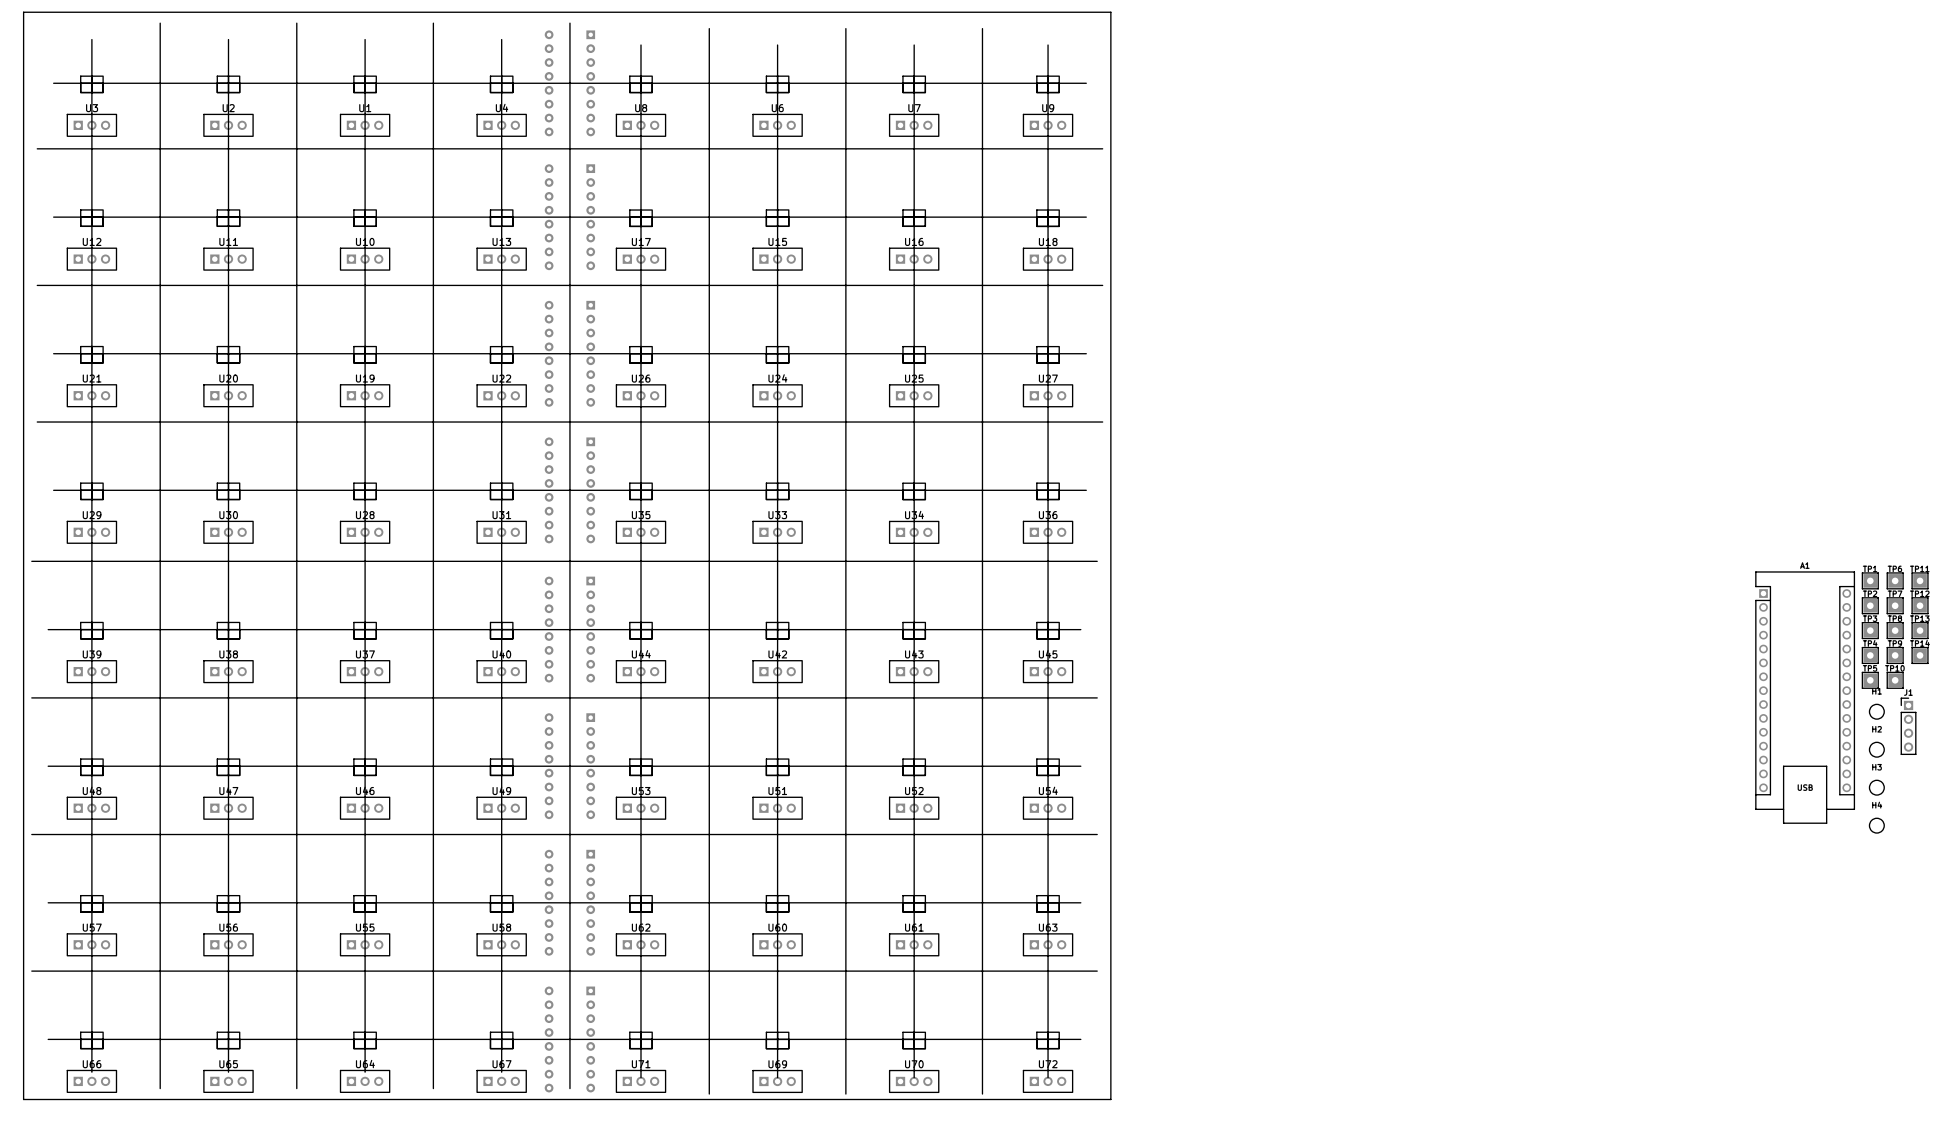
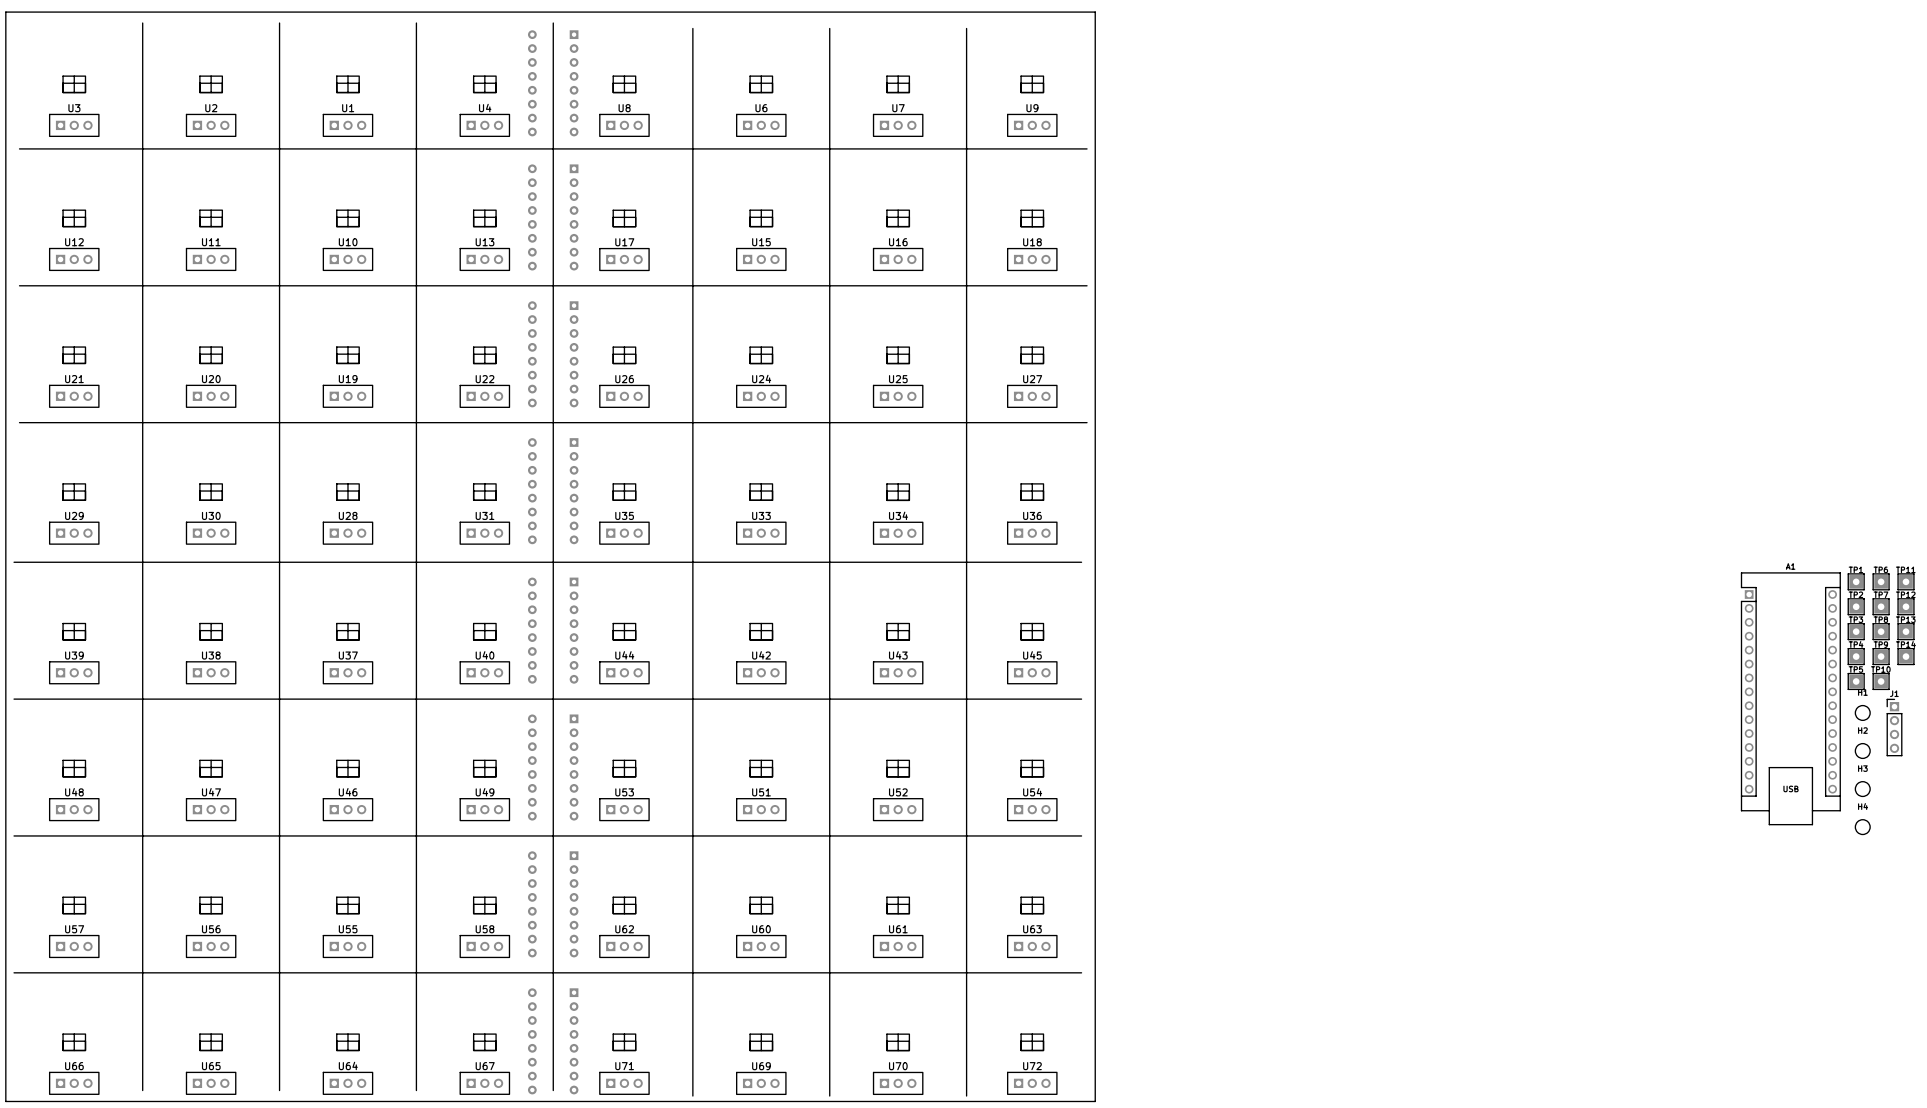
line: (91, 39) (91, 1072) -> none
line: (228, 39) (228, 1072) -> none
line: (365, 39) (365, 1072) -> none
line: (501, 39) (501, 1072) -> none
line: (640, 45) (640, 1077) -> none
line: (777, 45) (777, 1077) -> none
line: (914, 45) (914, 1077) -> none
line: (1048, 45) (1048, 1077) -> none
line: (53, 83) (1086, 83) -> none
line: (53, 217) (1086, 217) -> none
line: (53, 353) (1086, 353) -> none
line: (53, 490) (1086, 490) -> none
line: (48, 629) (1080, 629) -> none
line: (48, 766) (1080, 766) -> none
line: (48, 902) (1080, 902) -> none
line: (48, 1039) (1080, 1039) -> none

